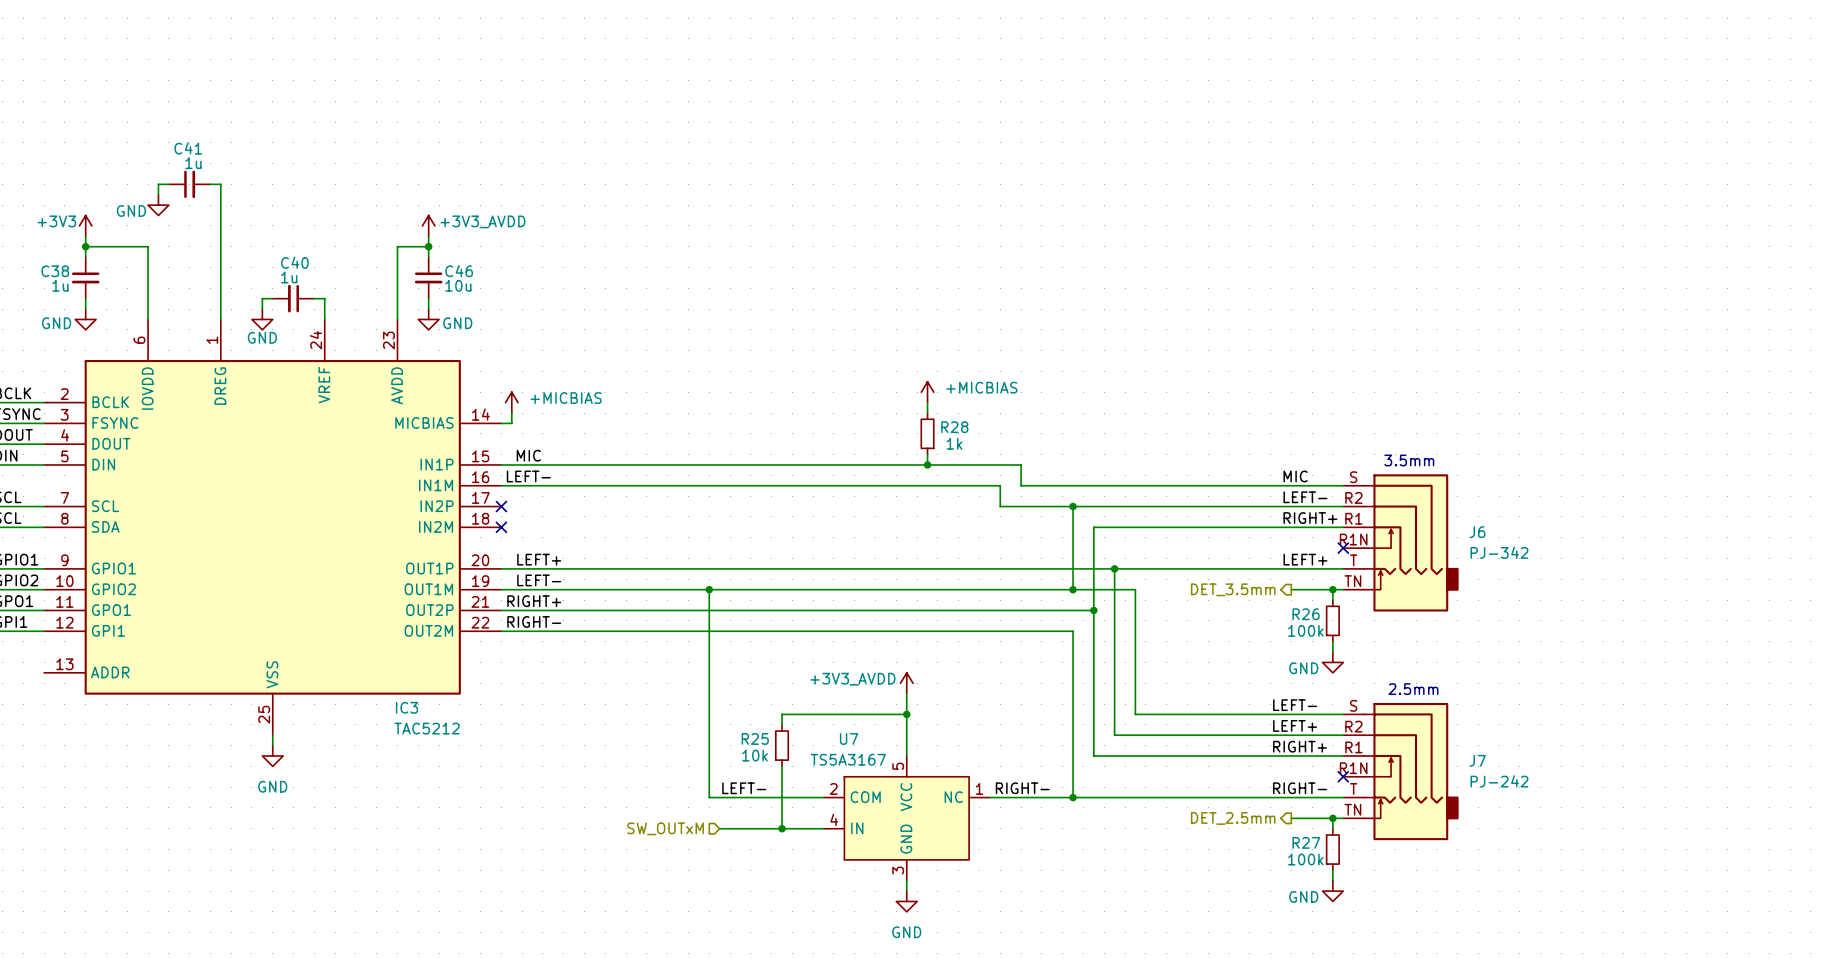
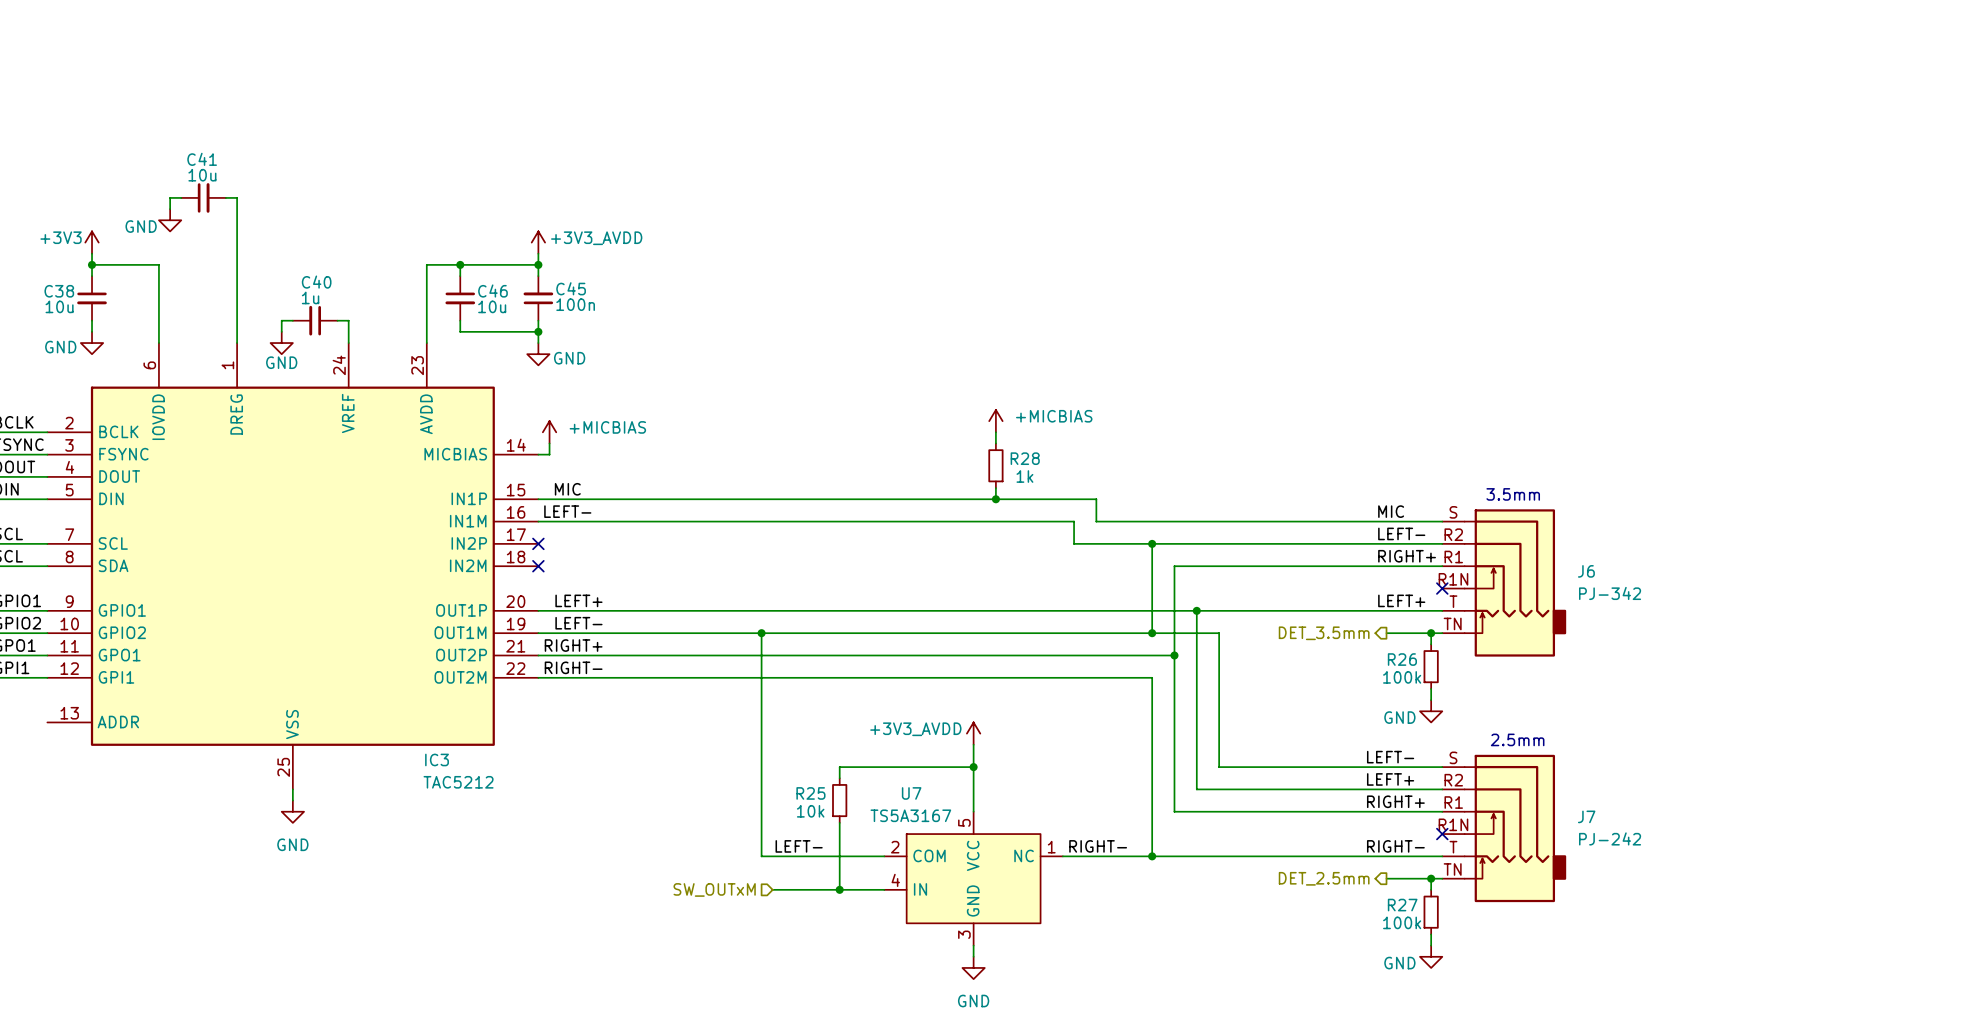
C41 value: 1u (193, 163) -> 10u (202, 175)
power symbol position: +3V3_AVDD (428, 225) -> +3V3_AVDD (538, 242)
wire: (428, 236) (428, 246) -> (538, 264) (460, 264)
wire: none -> (538, 253) (538, 276)
junction: none -> (538, 264)
C45: none -> 100n (538, 298)
C38 value: 1u (60, 285) -> 10u (59, 306)
wire: none -> (538, 320) (538, 343)
wire: none -> (460, 331) (538, 331)
junction: none -> (538, 331)
power symbol position: GND (428, 319) -> GND (538, 354)

